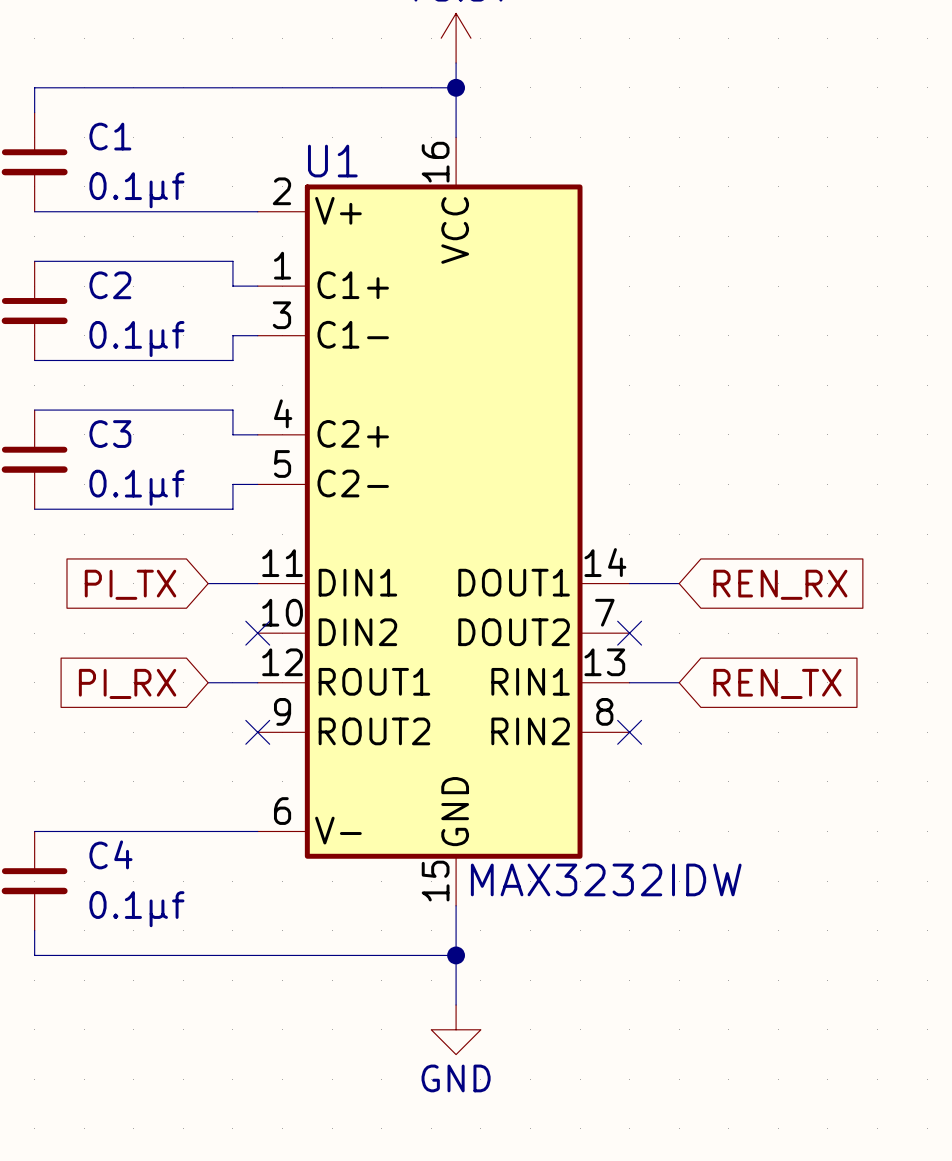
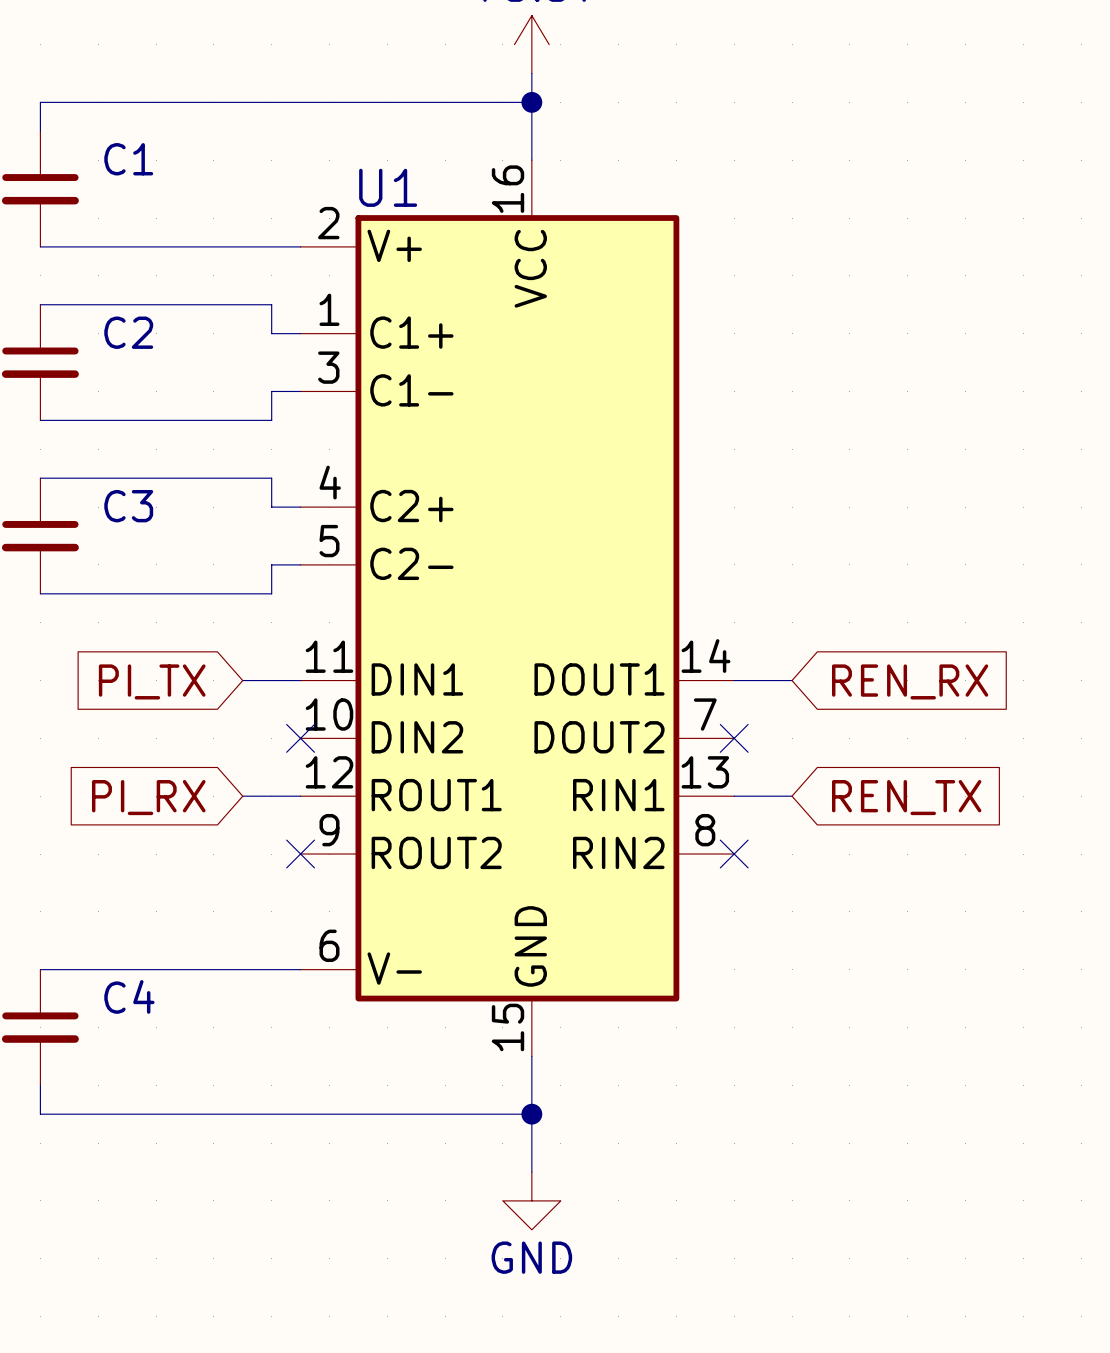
C1 value: 0.1μf (136, 190) -> none
C2 value: 0.1μf (136, 339) -> none
C3 value: 0.1μf (136, 487) -> none
U1 value: MAX3232IDW (606, 879) -> none
C4 value: 0.1μf (136, 909) -> none

